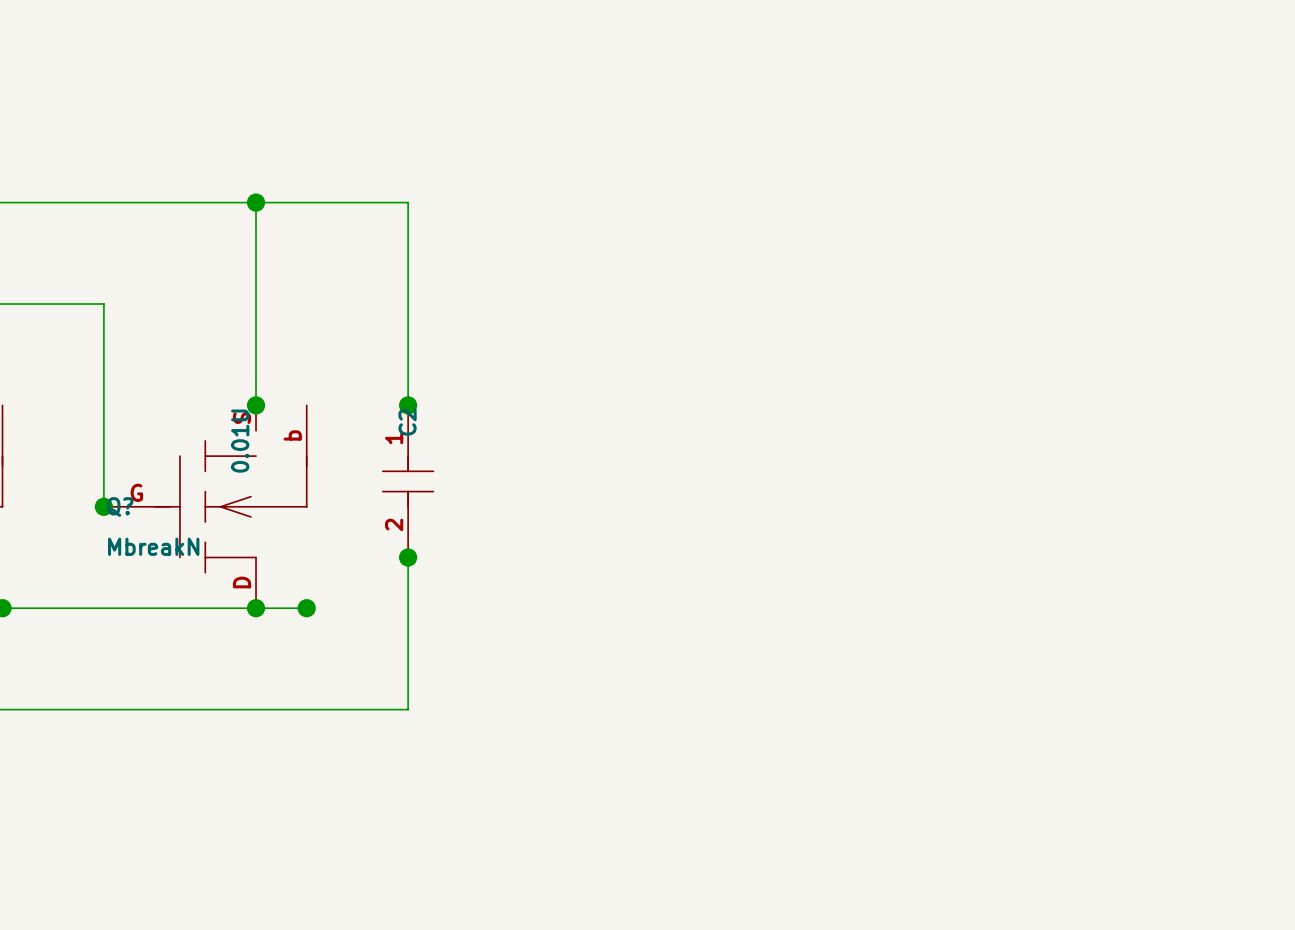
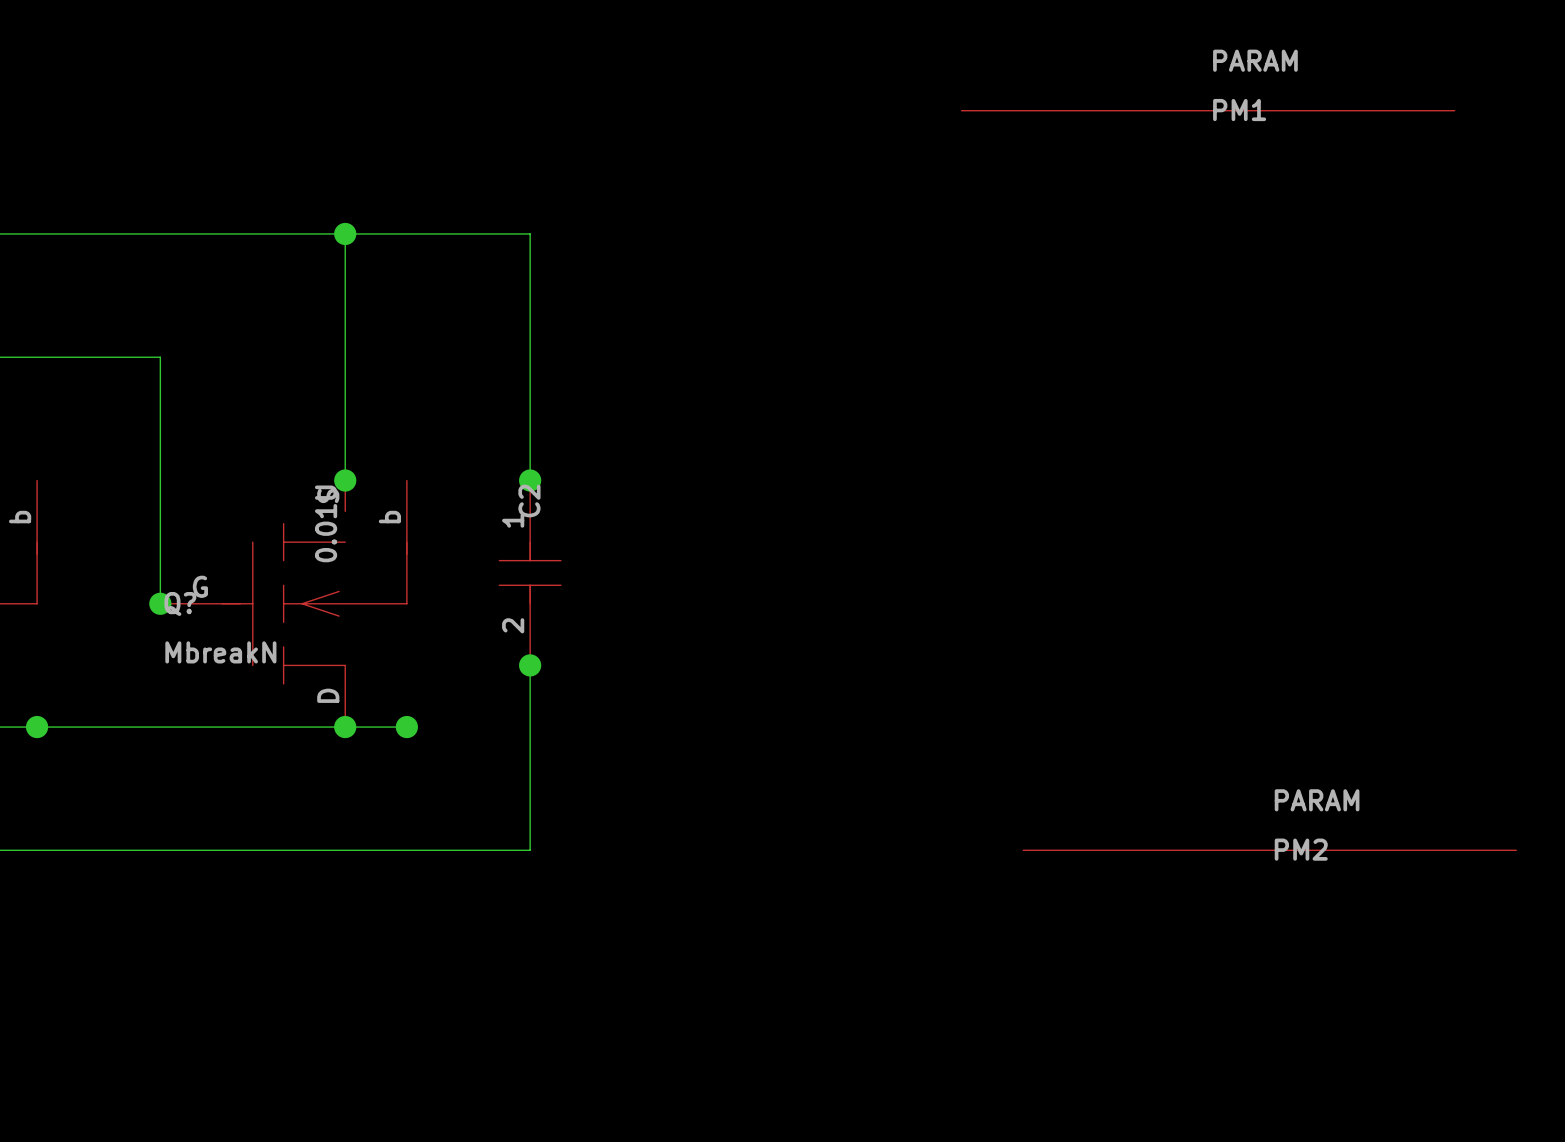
PM1: none -> PARAM (1208, 110)
PM2: none -> PARAM (1269, 850)

